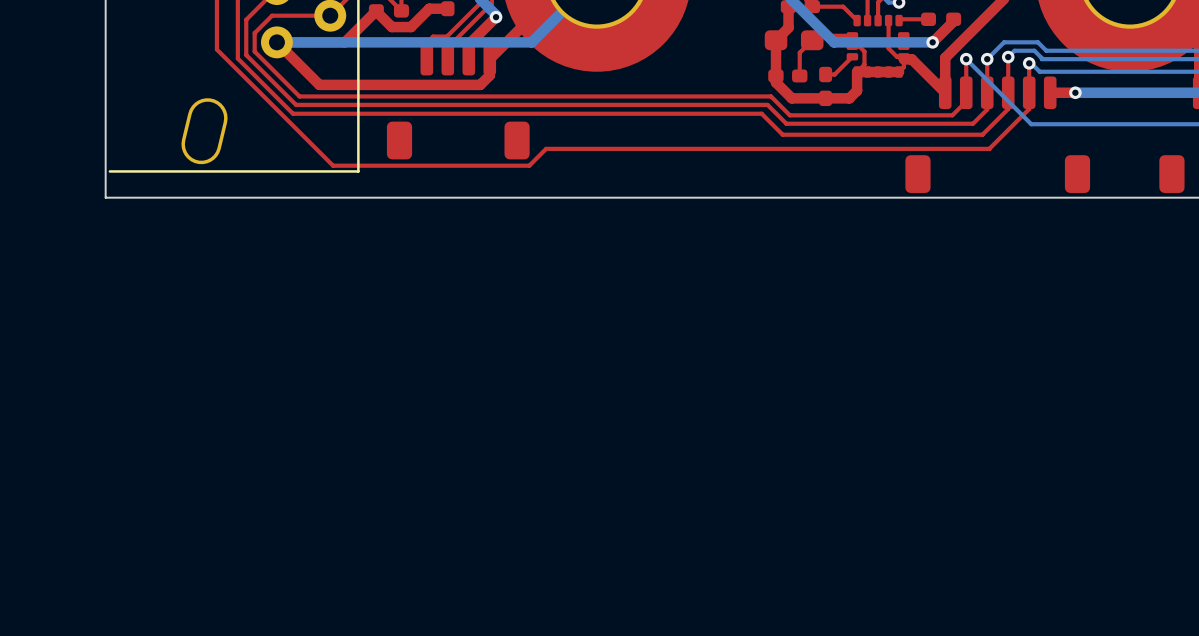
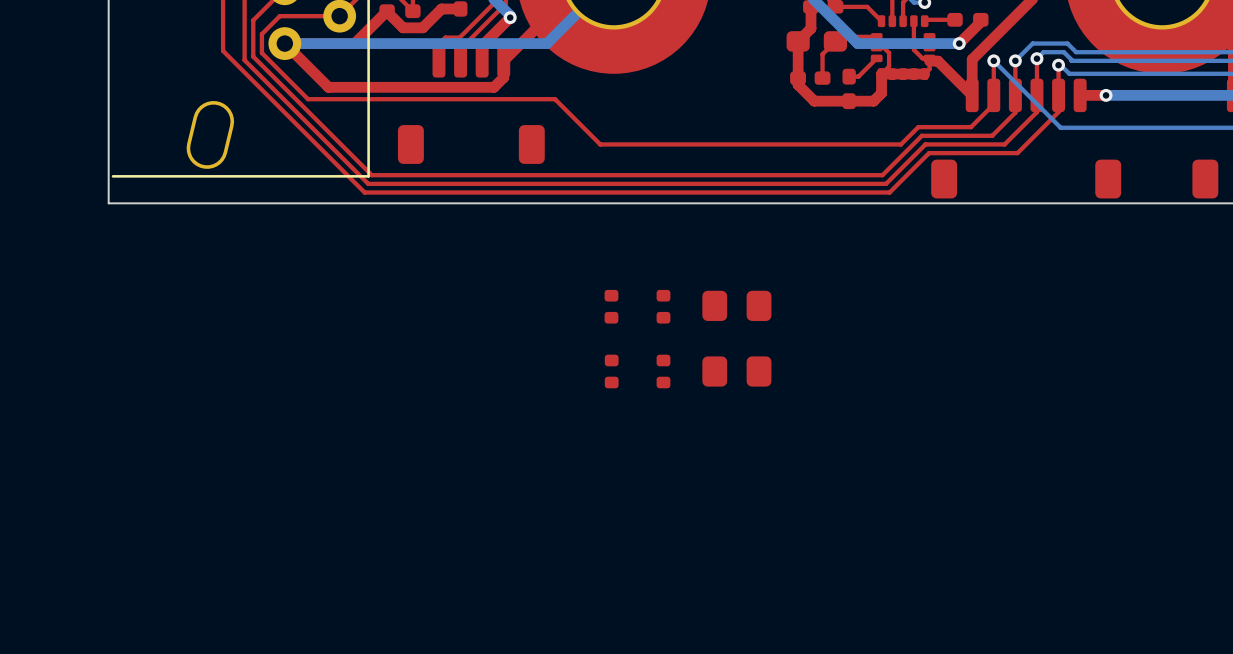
top track: (539, 96) (771, 96) (789, 115) (952, 115) -> (555, 99) (600, 144) (901, 144) (918, 127) (971, 127) (979, 118)
top track: (296, 104) (767, 104) (786, 123) (973, 123) -> (304, 107) (371, 175) (882, 175) (921, 135) (992, 135) (1000, 127)
top track: (293, 113) (761, 113) (782, 134) (982, 134) -> (301, 116) (368, 183) (886, 183) (925, 144) (1004, 144) (1010, 138)
top track: (903, 148) (546, 148) (529, 165) (333, 165) -> (929, 153) (889, 192) (364, 192) (342, 170)
part: none -> (736, 305)
part: none -> (611, 306)
part: none -> (663, 306)
part: none -> (611, 371)
part: none -> (663, 371)
part: none -> (736, 371)

